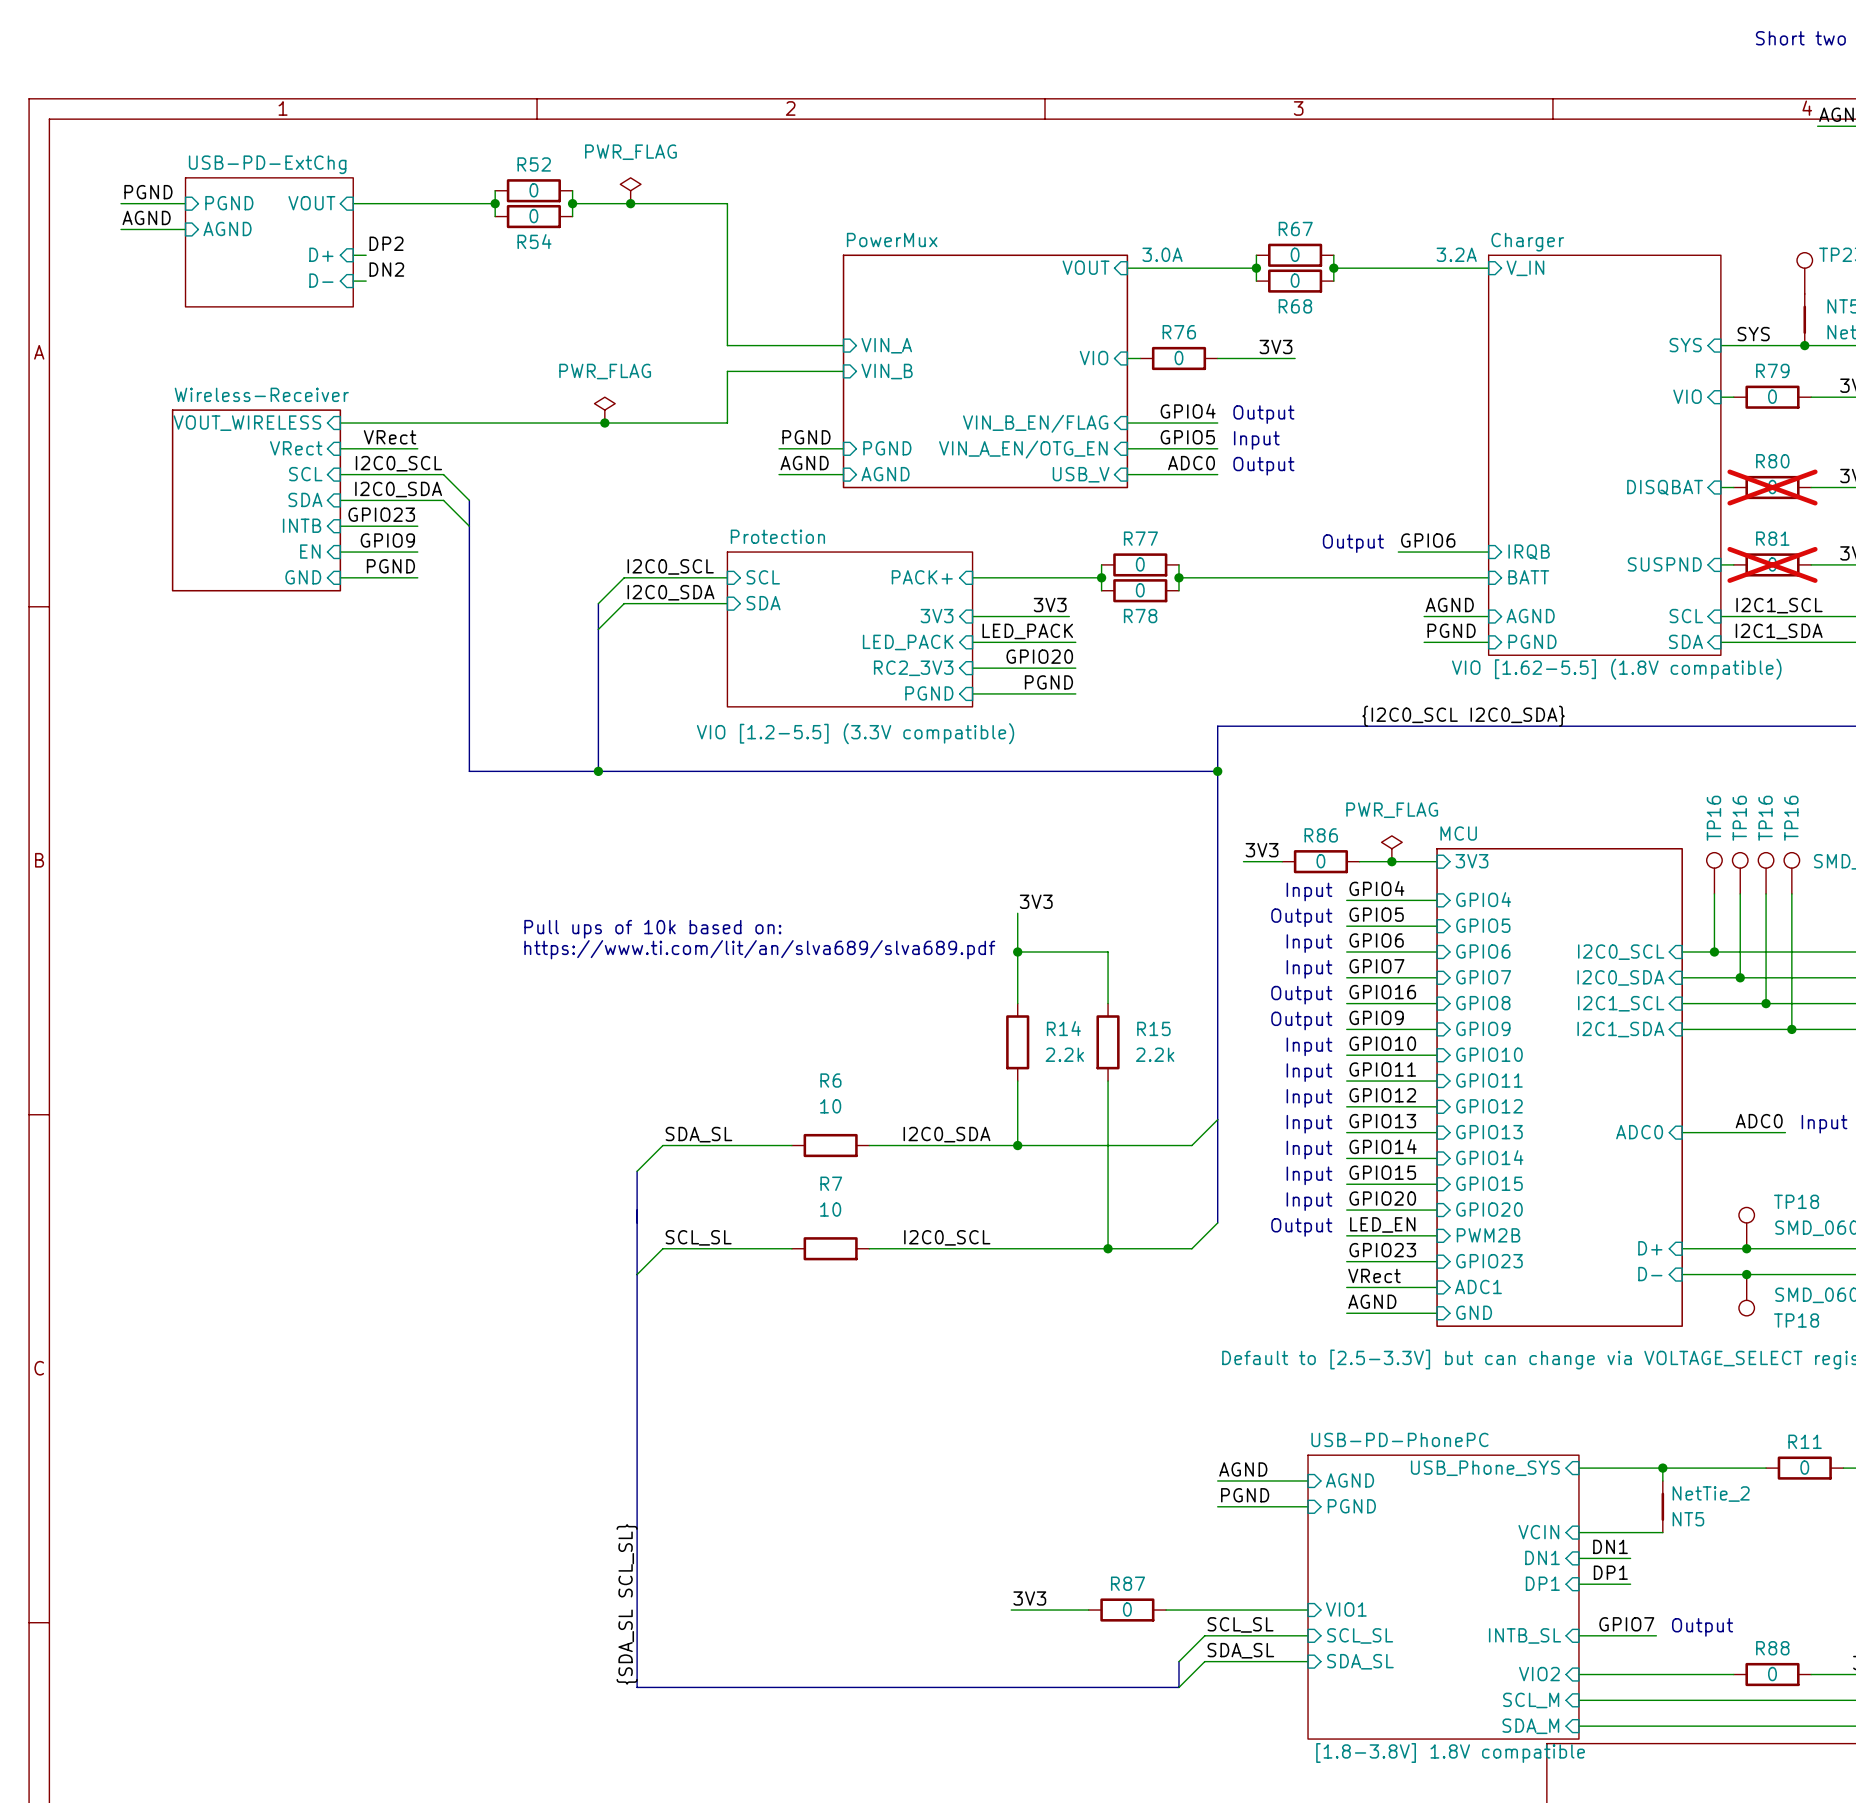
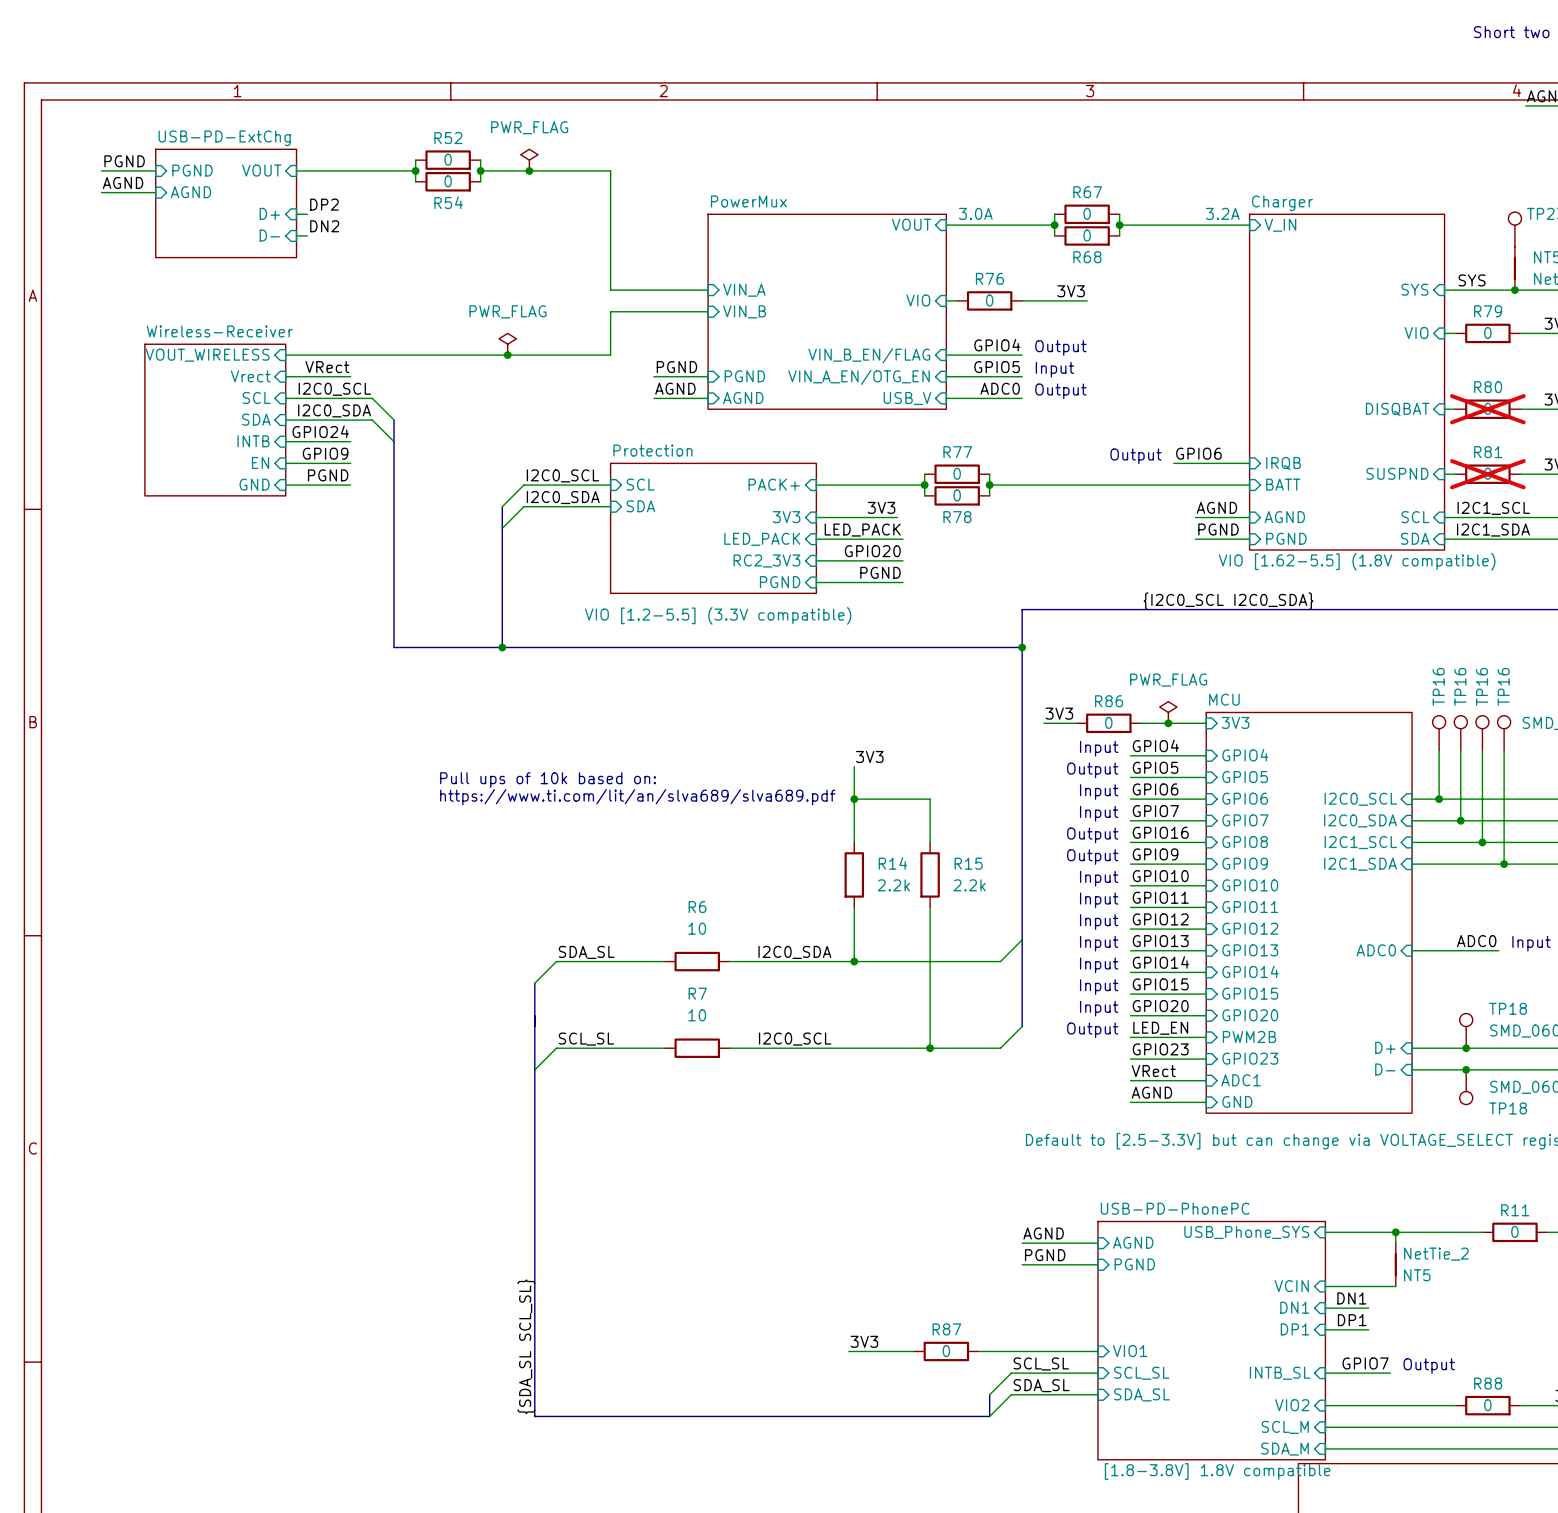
sheet pin: VRect (296, 448) -> Vrect (250, 376)
label: GPIO23 (381, 514) -> GPIO24 (320, 431)

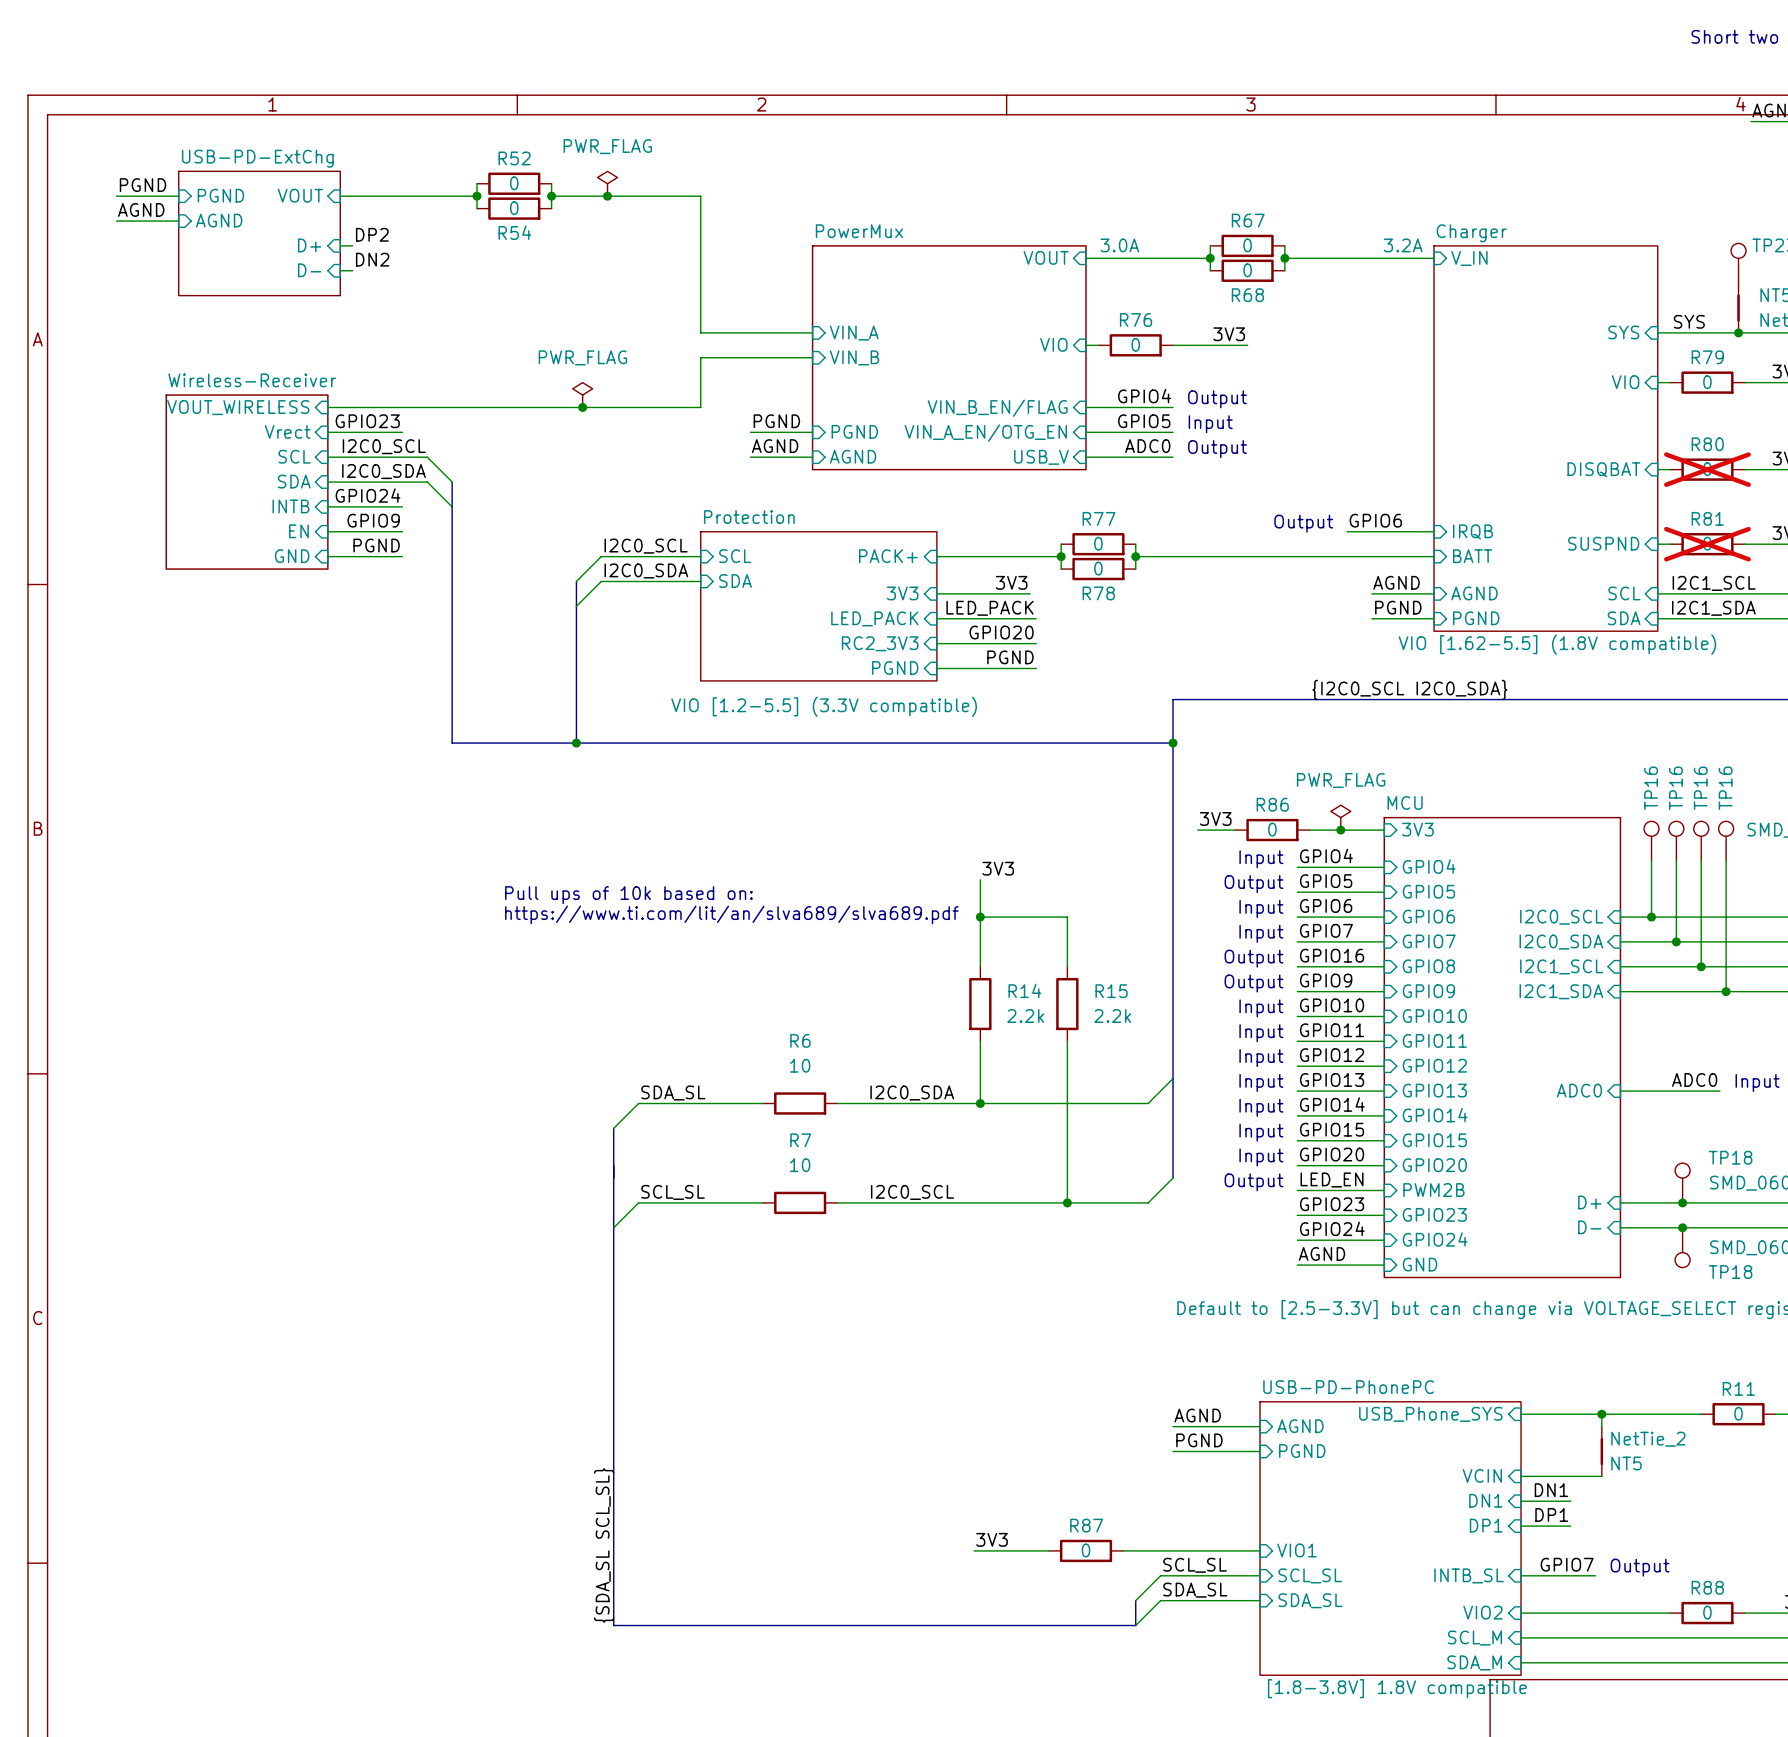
label: VRect (327, 367) -> GPIO23 (367, 421)
label: VRect (1153, 1071) -> GPIO24 (1332, 1228)
sheet pin: ADC1 (1241, 1080) -> GPIO24 (1435, 1239)

